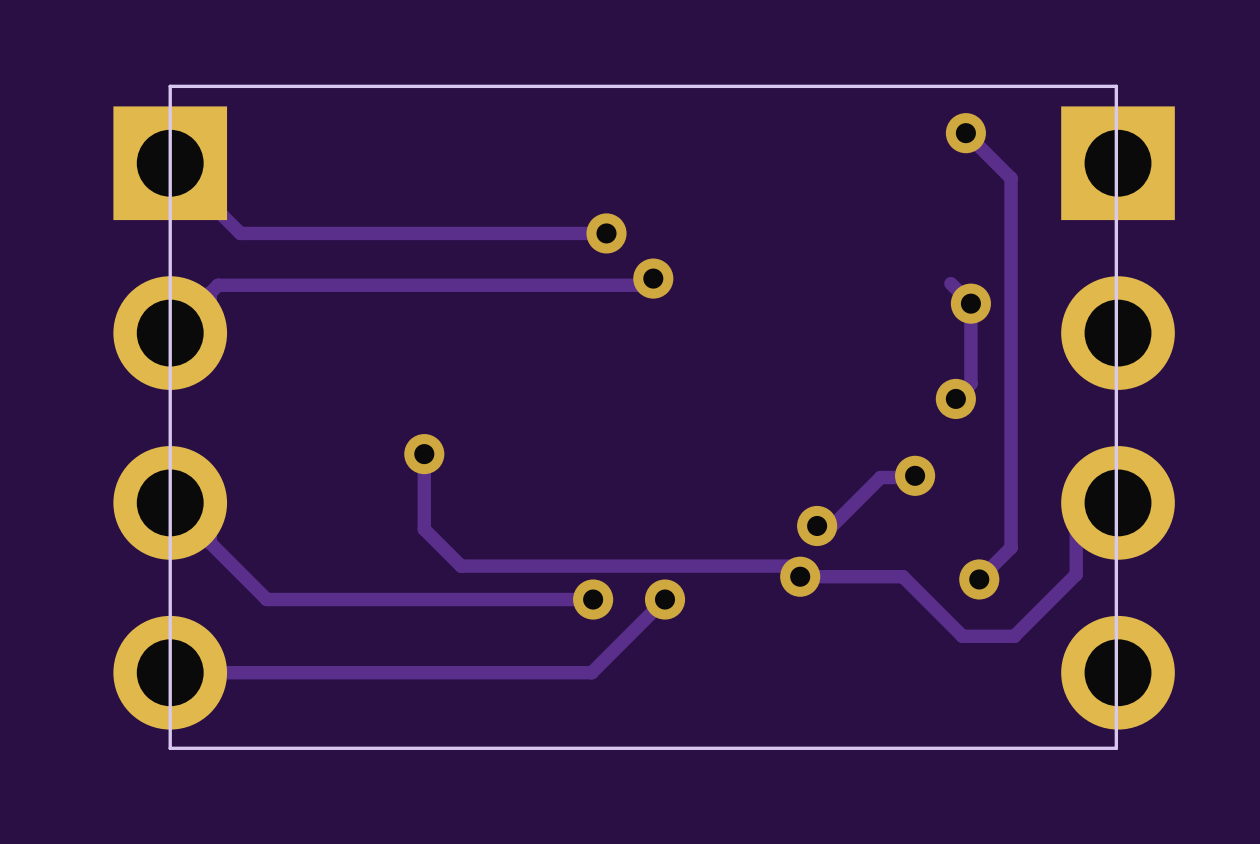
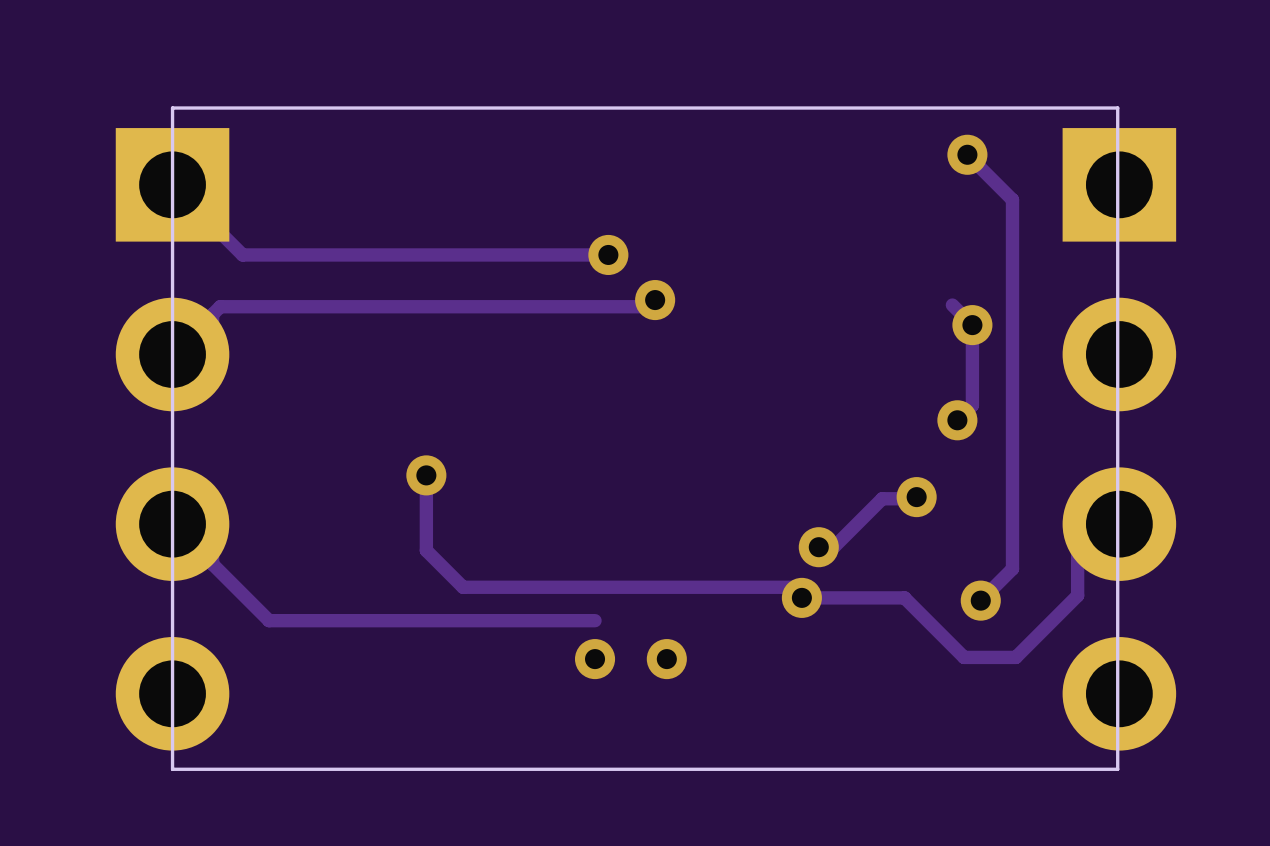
via position: (593, 599) -> (595, 659)
track: (665, 599) (591, 672) (210, 672) -> none
via position: (665, 599) -> (666, 659)

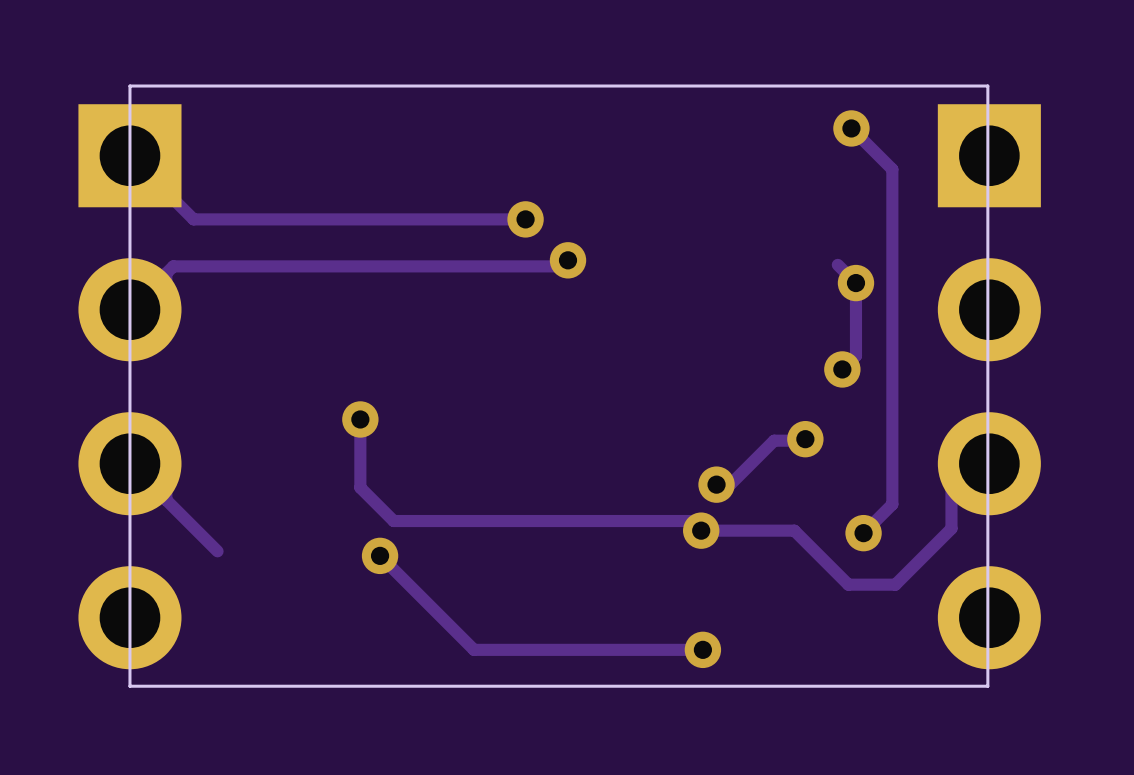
track: (595, 620) (269, 620) -> none
track: none -> (380, 555) (474, 649) (702, 649)
via: none -> (380, 555)
via: (595, 659) -> none
via: (666, 659) -> none
via: none -> (702, 649)

